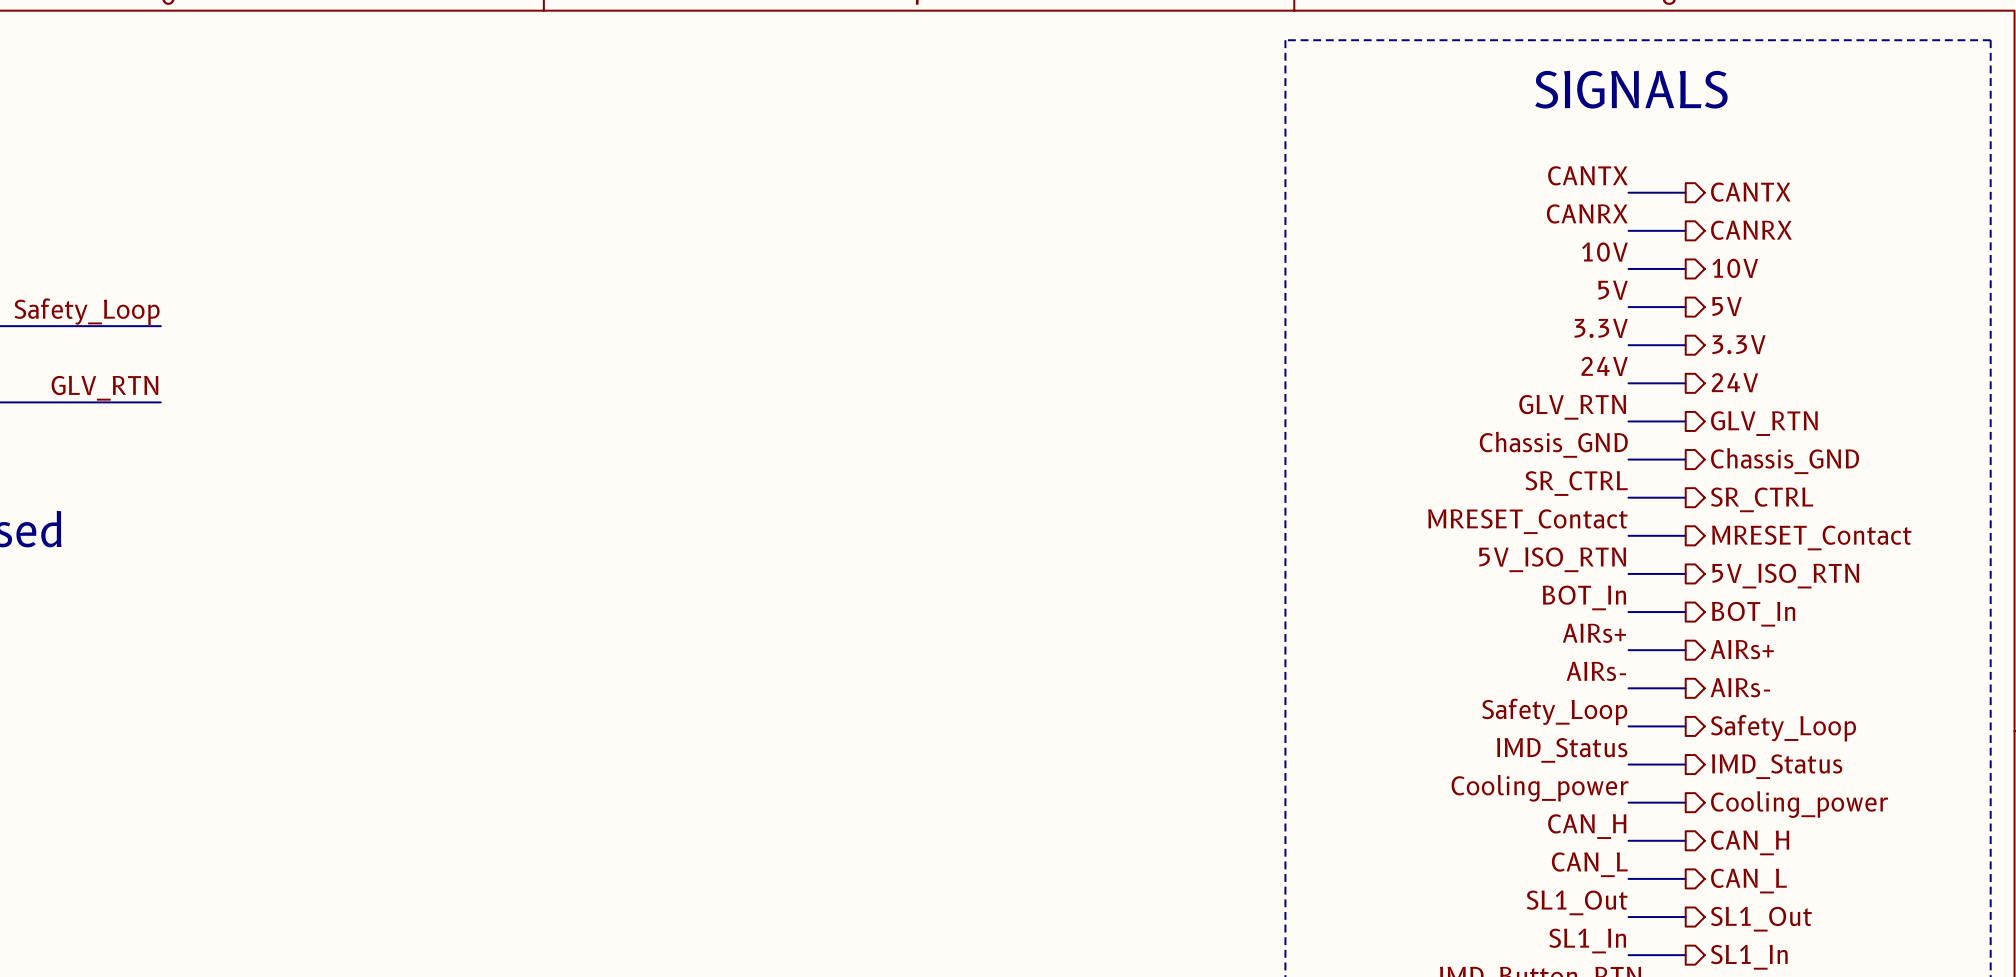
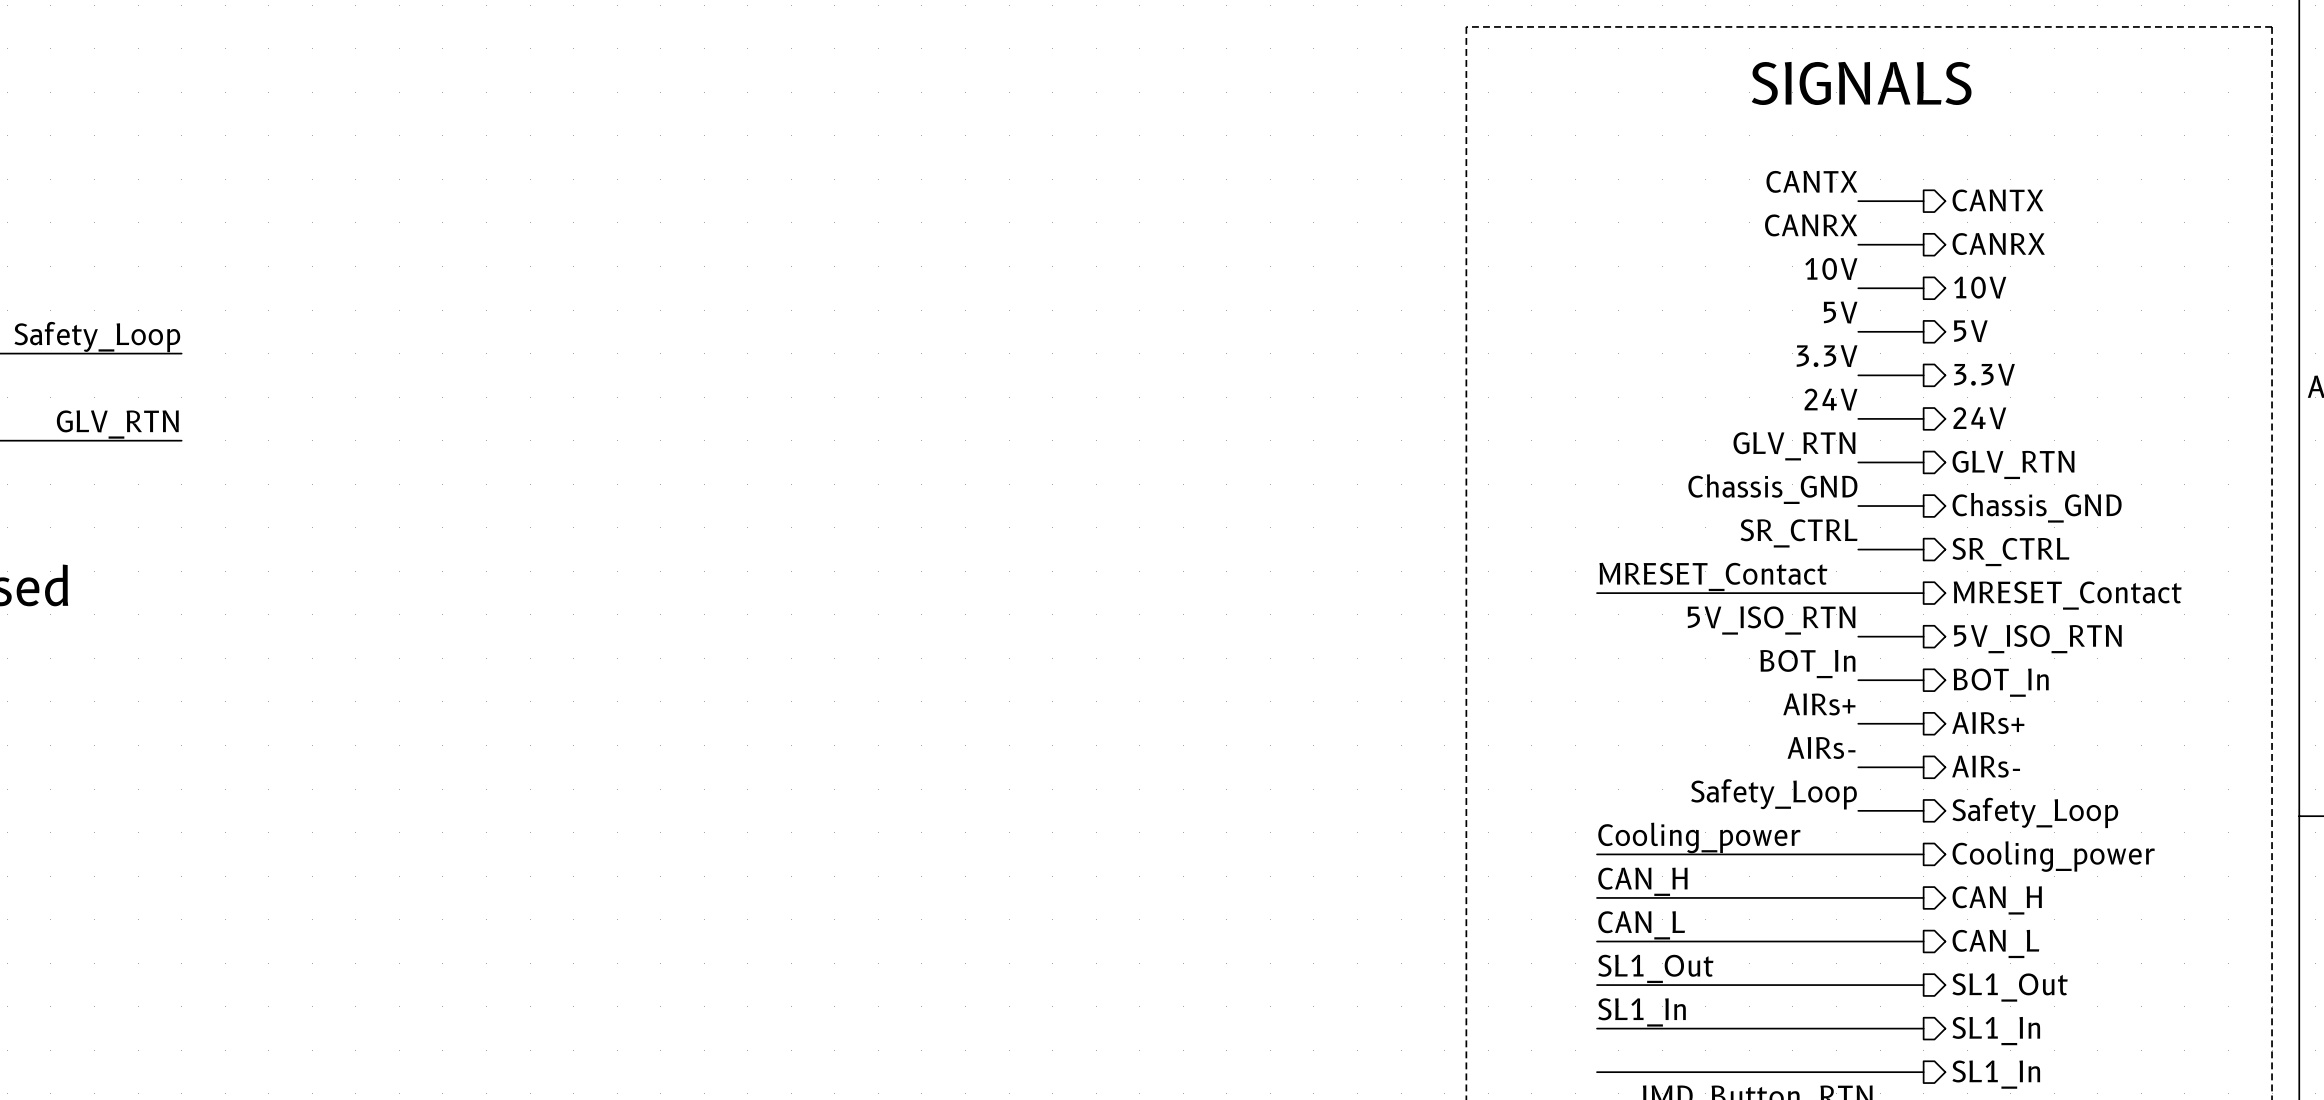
label position: MRESET_Contact (1527, 521) -> MRESET_Contact (1713, 576)
wire: none -> (1597, 593) (1858, 593)
label: IMD_Status (1562, 750) -> none
wire: none -> (1597, 854) (1858, 854)
hierarchical label: IMD_Status (1777, 766) -> Cooling_power (2053, 856)
label position: Cooling_power (1540, 788) -> Cooling_power (1699, 837)
wire: none -> (1597, 897) (1858, 897)
hierarchical label: Cooling_power (1799, 804) -> CAN_H (1997, 900)
label position: CAN_H (1587, 826) -> CAN_H (1642, 881)
wire: none -> (1597, 941) (1858, 941)
hierarchical label: CAN_H (1750, 842) -> CAN_L (1995, 943)
label position: CAN_L (1589, 864) -> CAN_L (1641, 925)
wire: none -> (1597, 985) (1858, 985)
hierarchical label: CAN_L (1748, 881) -> SL1_Out (2010, 987)
label position: SL1_Out (1577, 902) -> SL1_Out (1655, 968)
wire: none -> (1597, 1028) (1858, 1028)
hierarchical label: SL1_Out (1761, 919) -> SL1_In (1996, 1031)
label position: SL1_In (1587, 941) -> SL1_In (1642, 1012)
wire: none -> (1597, 1072) (1858, 1072)

